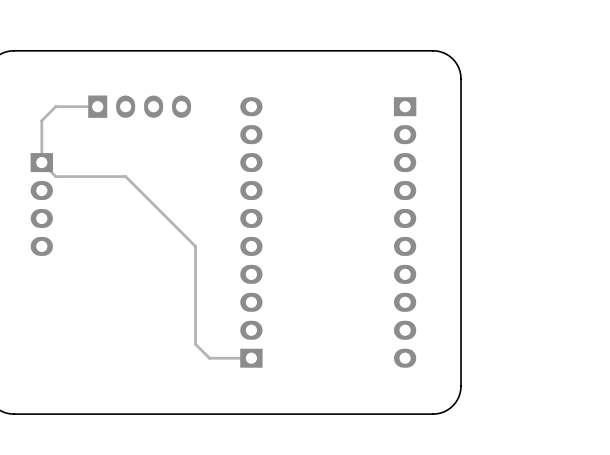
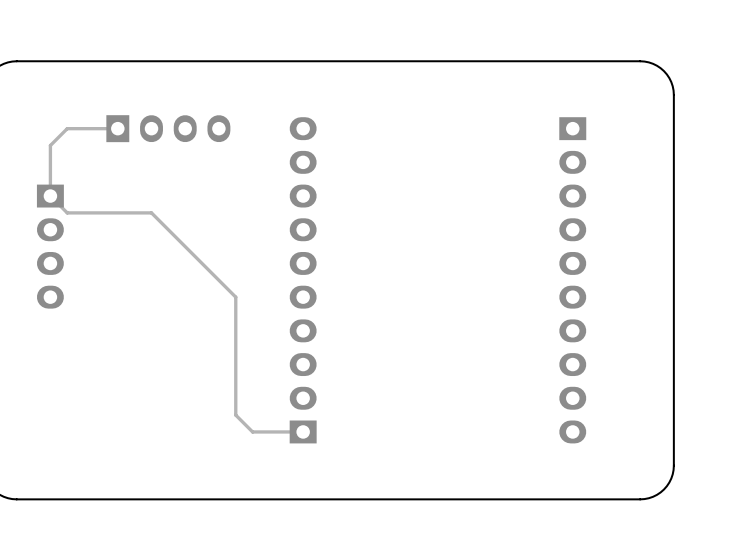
board edge: (433, 50) (443, 52) (452, 58) (458, 68) (461, 78) (460, 389) (452, 405) (443, 411) (433, 414) -> (522, 61) (648, 62) (660, 68) (666, 74) (672, 86) (673, 94) (673, 465) (671, 478) (660, 492) (644, 499) (522, 499)
part position: (405, 232) -> (572, 280)

